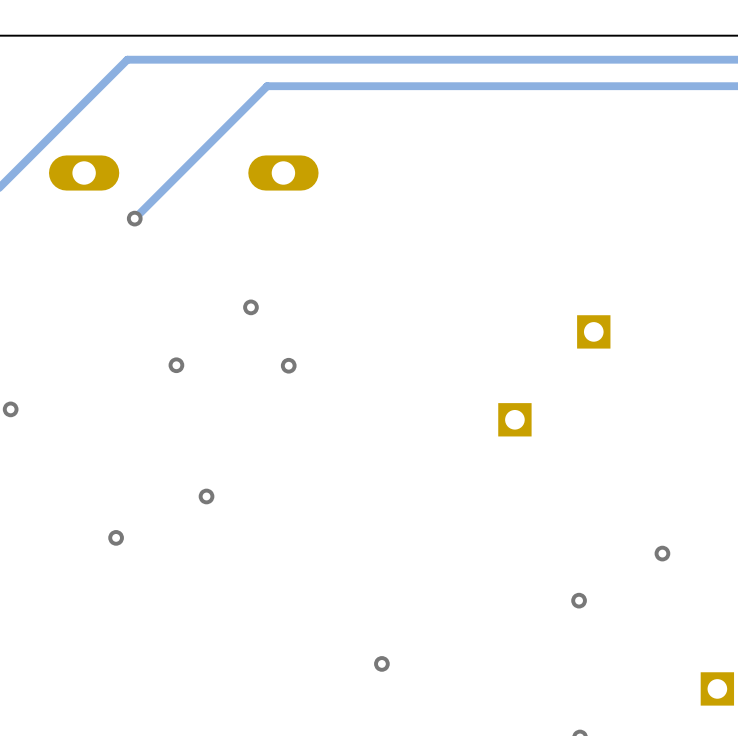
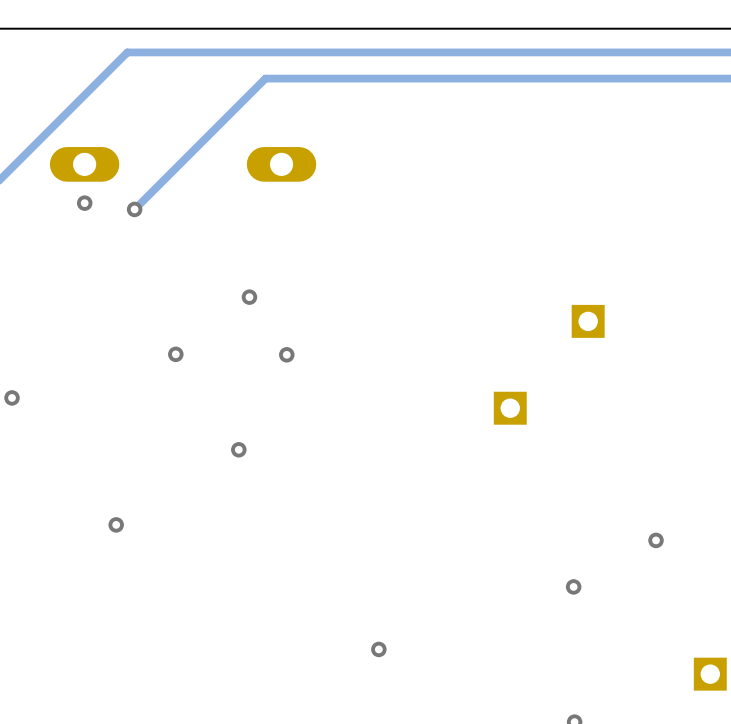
via: none -> (84, 203)
via position: (206, 496) -> (238, 449)

